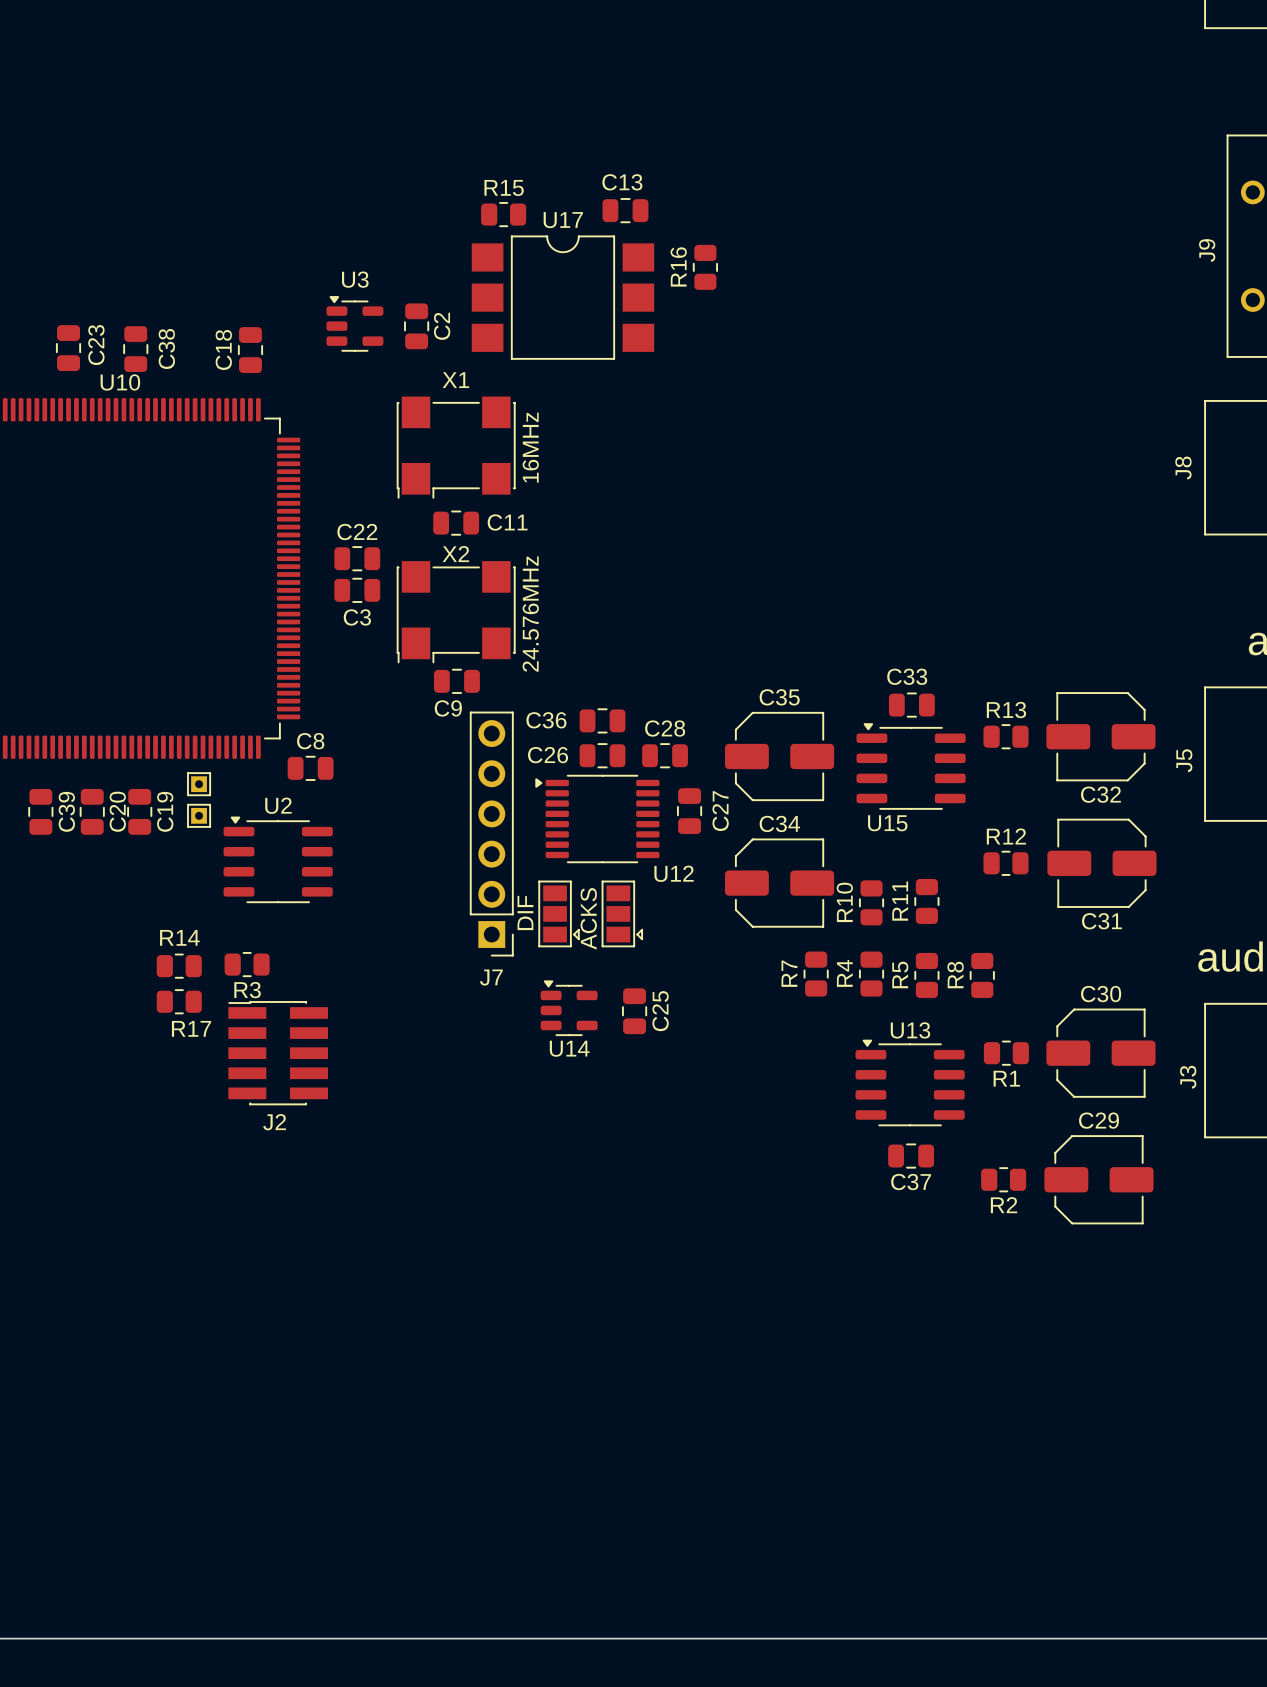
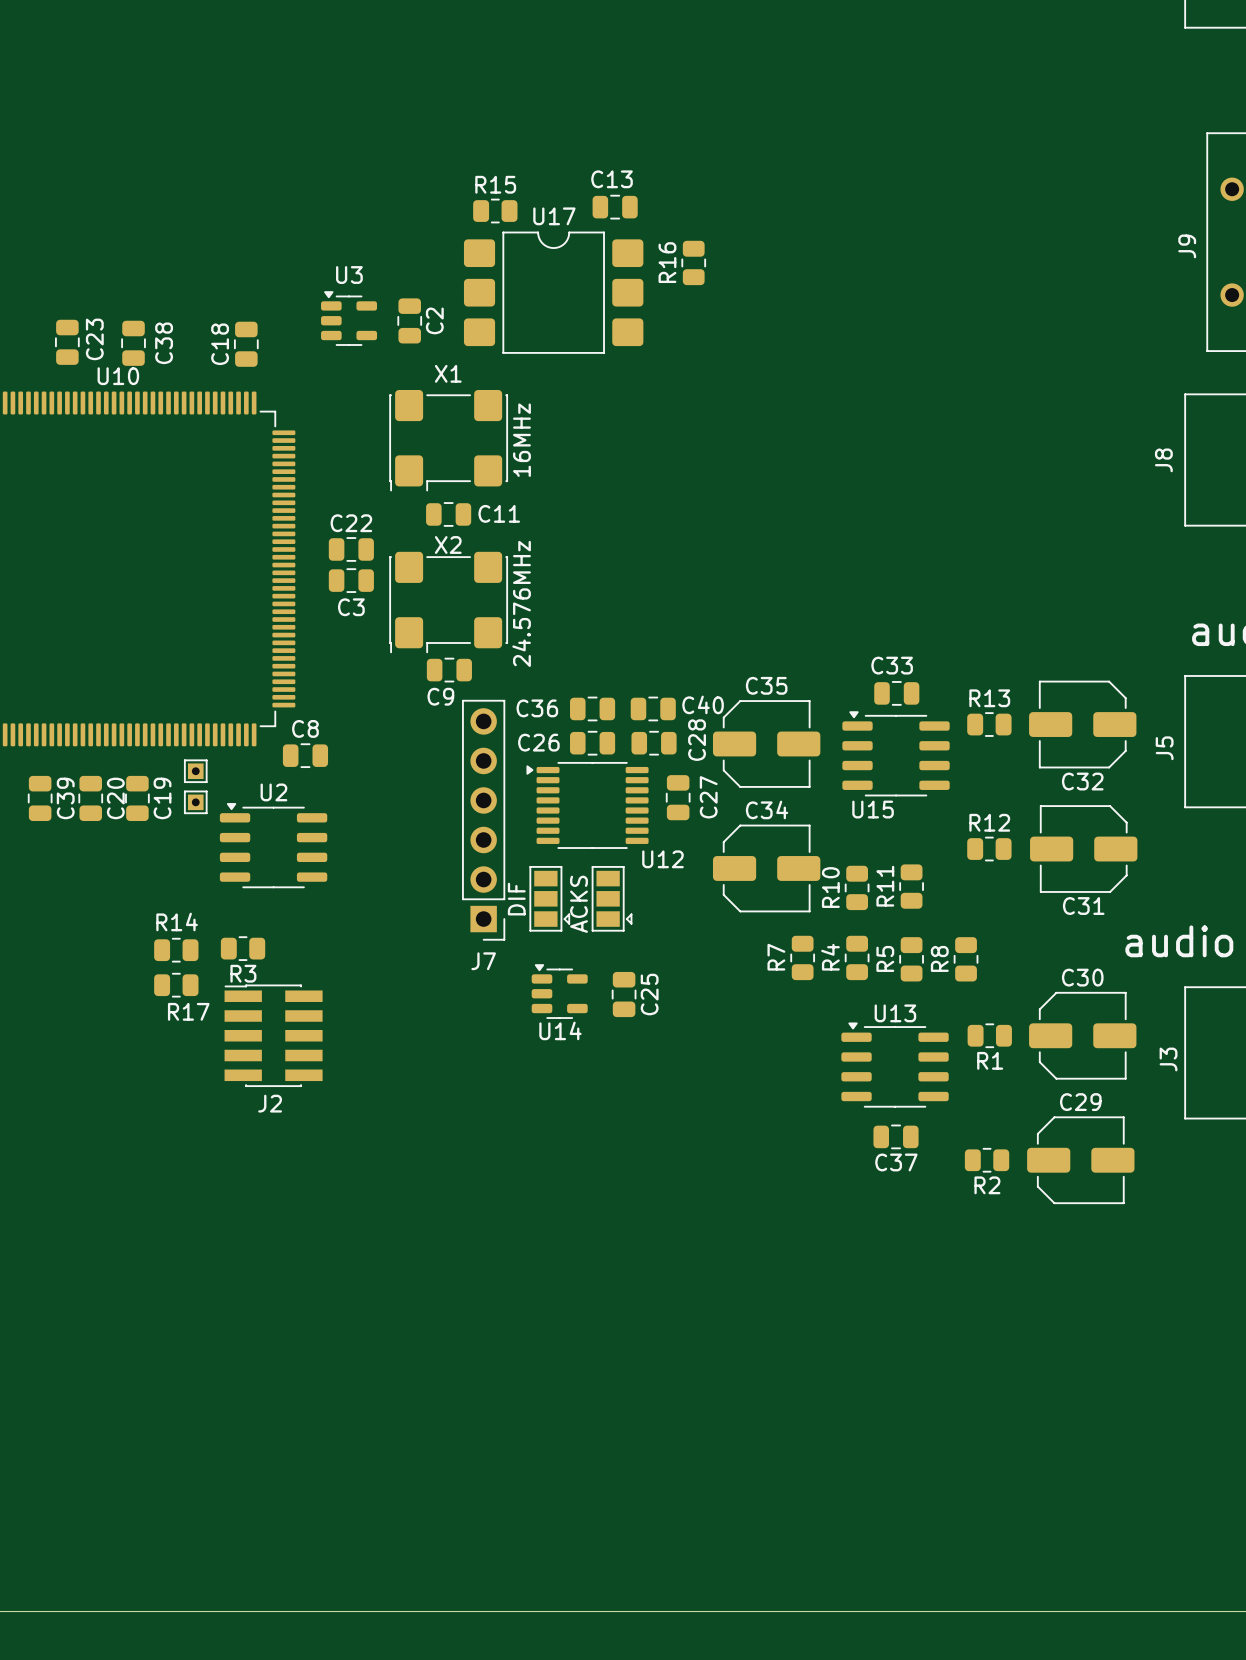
U17 footprint: [471, 235, 655, 360] -> [463, 231, 644, 354]
X1 footprint: [396, 396, 516, 499] -> [389, 389, 509, 492]
X2 footprint: [396, 561, 516, 664] -> [389, 551, 509, 654]
C40: none -> (653, 708)
C28 name rotation: 0° (665, 728) -> 90° counterclockwise (697, 740)

